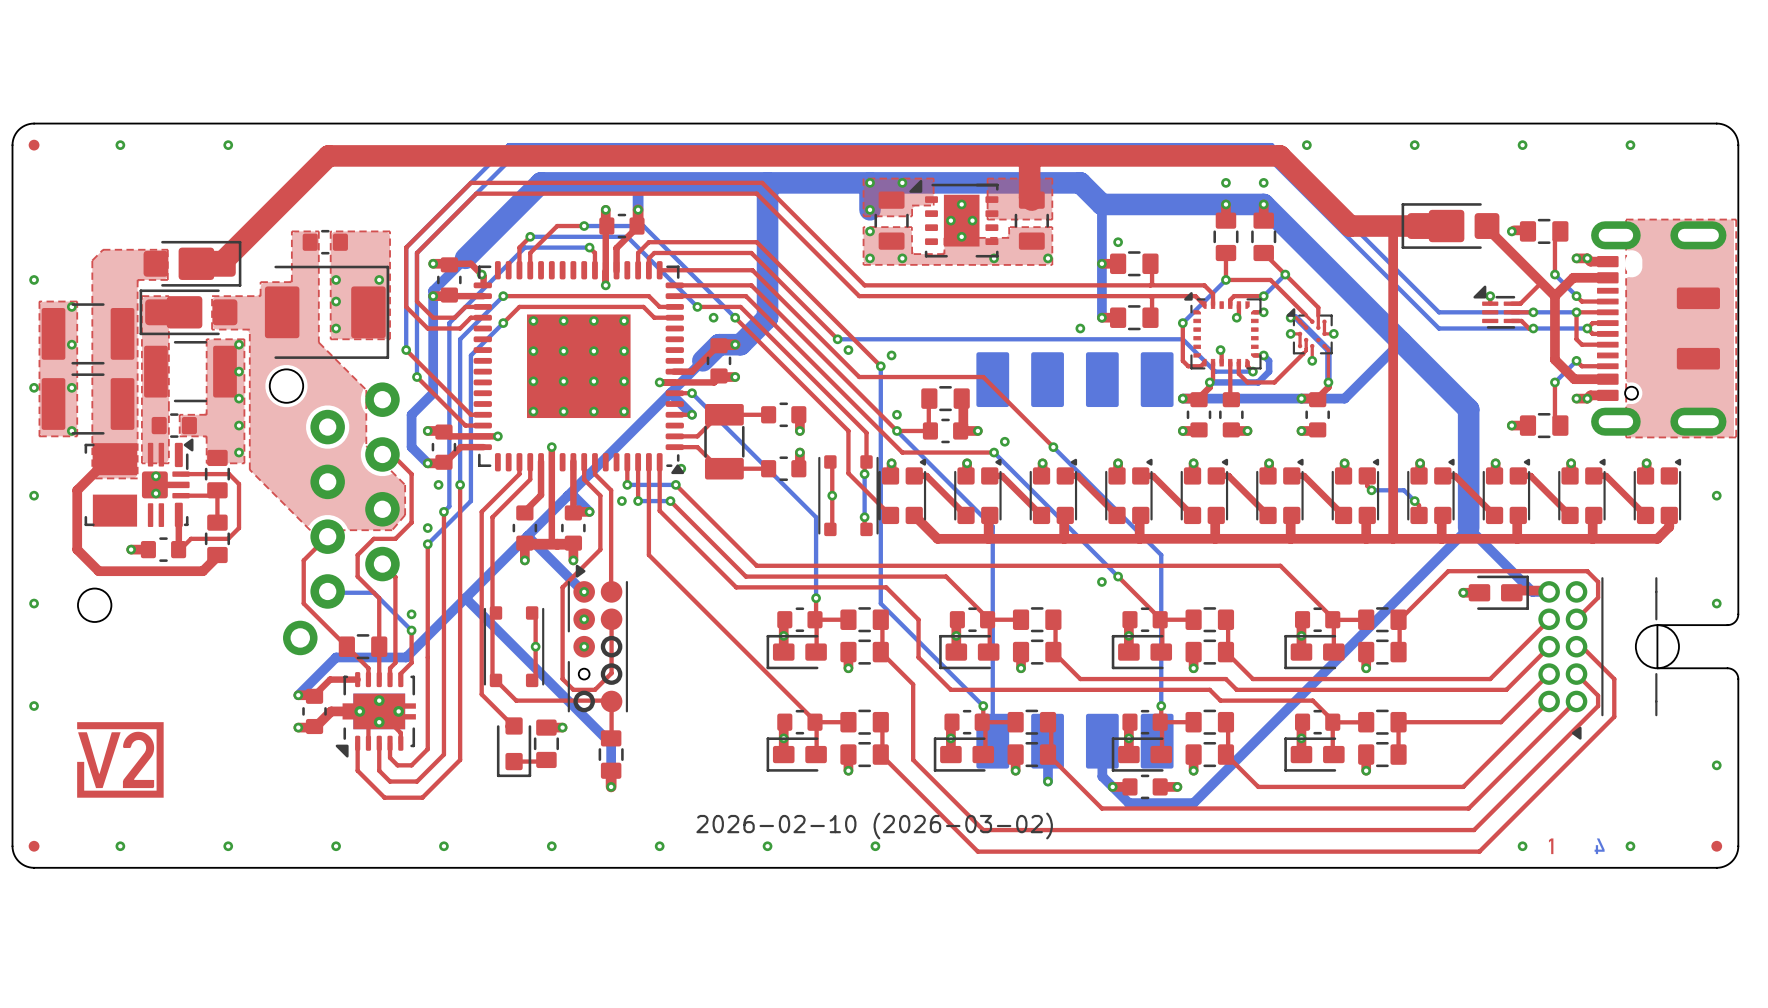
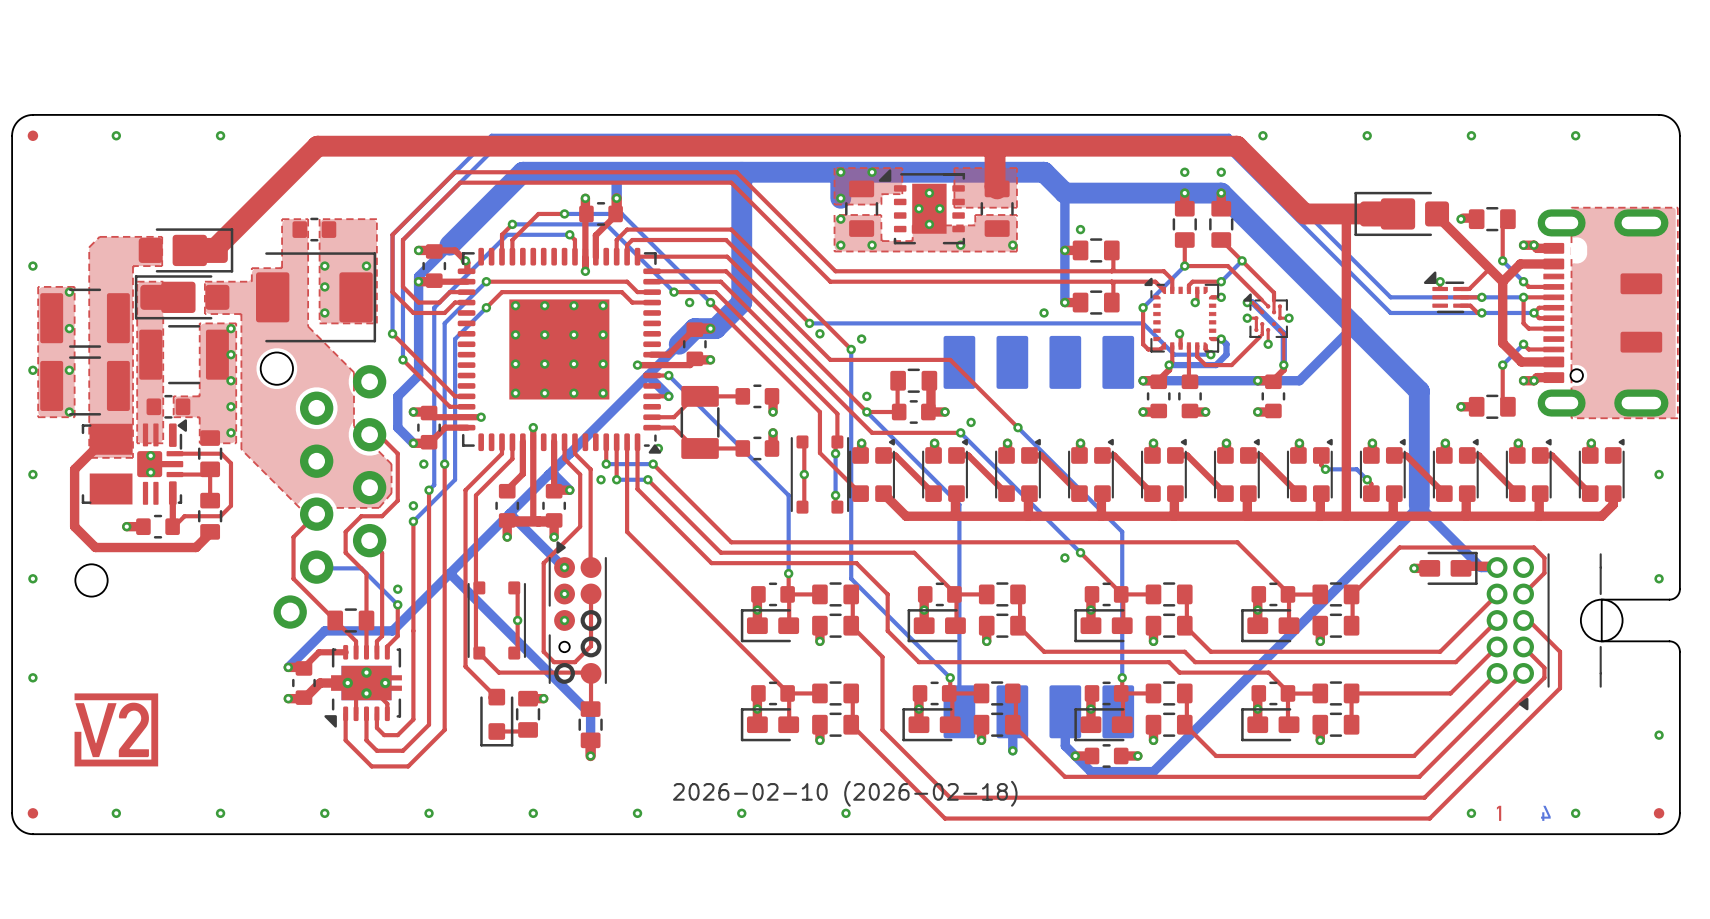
drawing shape: [696, 812, 1053, 840] -> [672, 780, 1018, 807]

